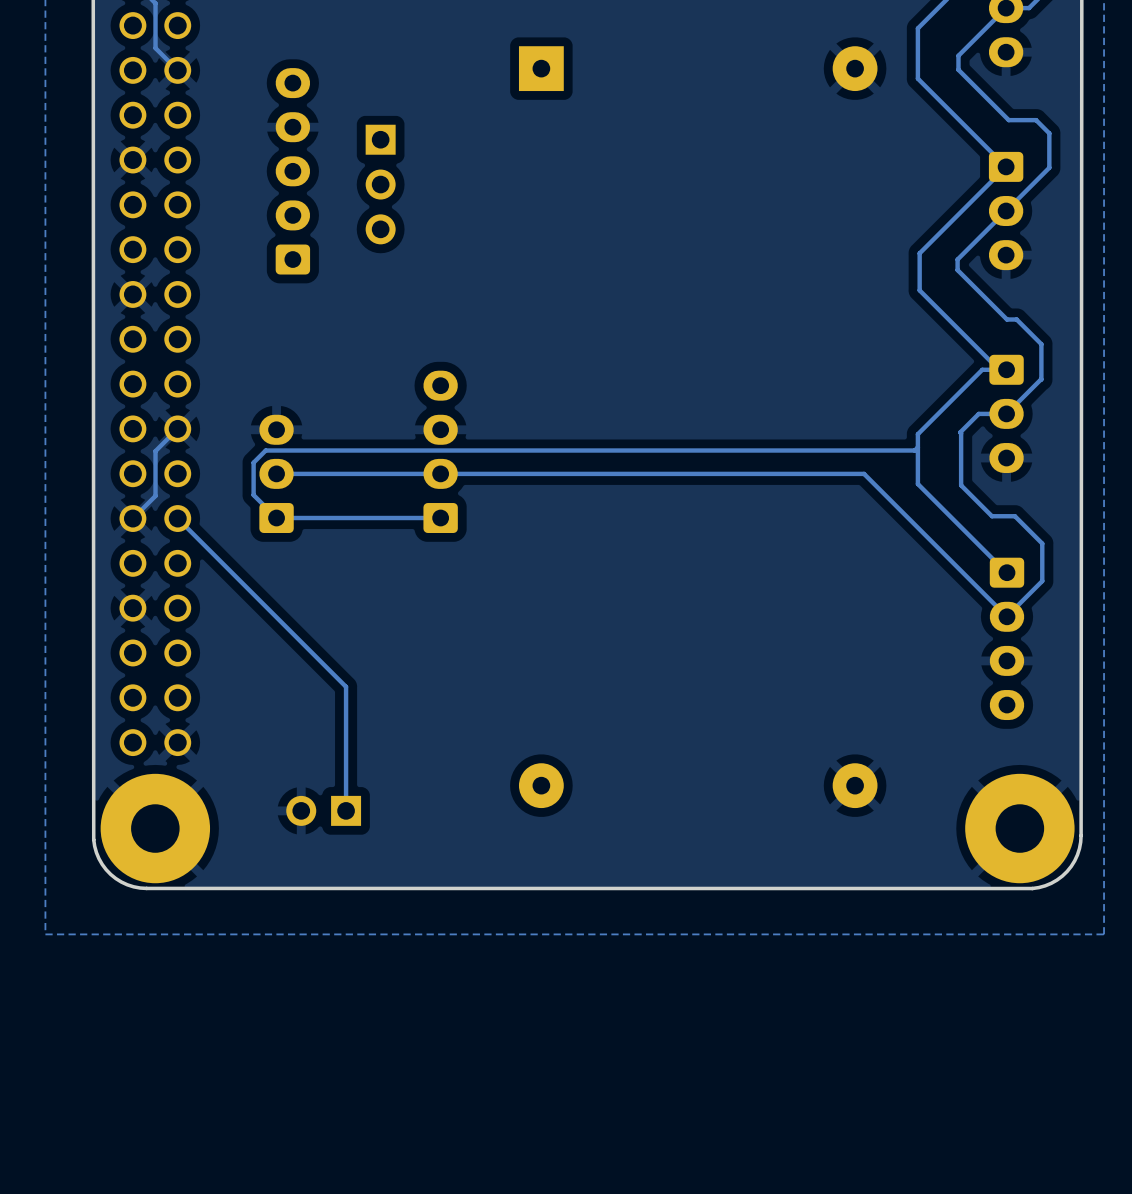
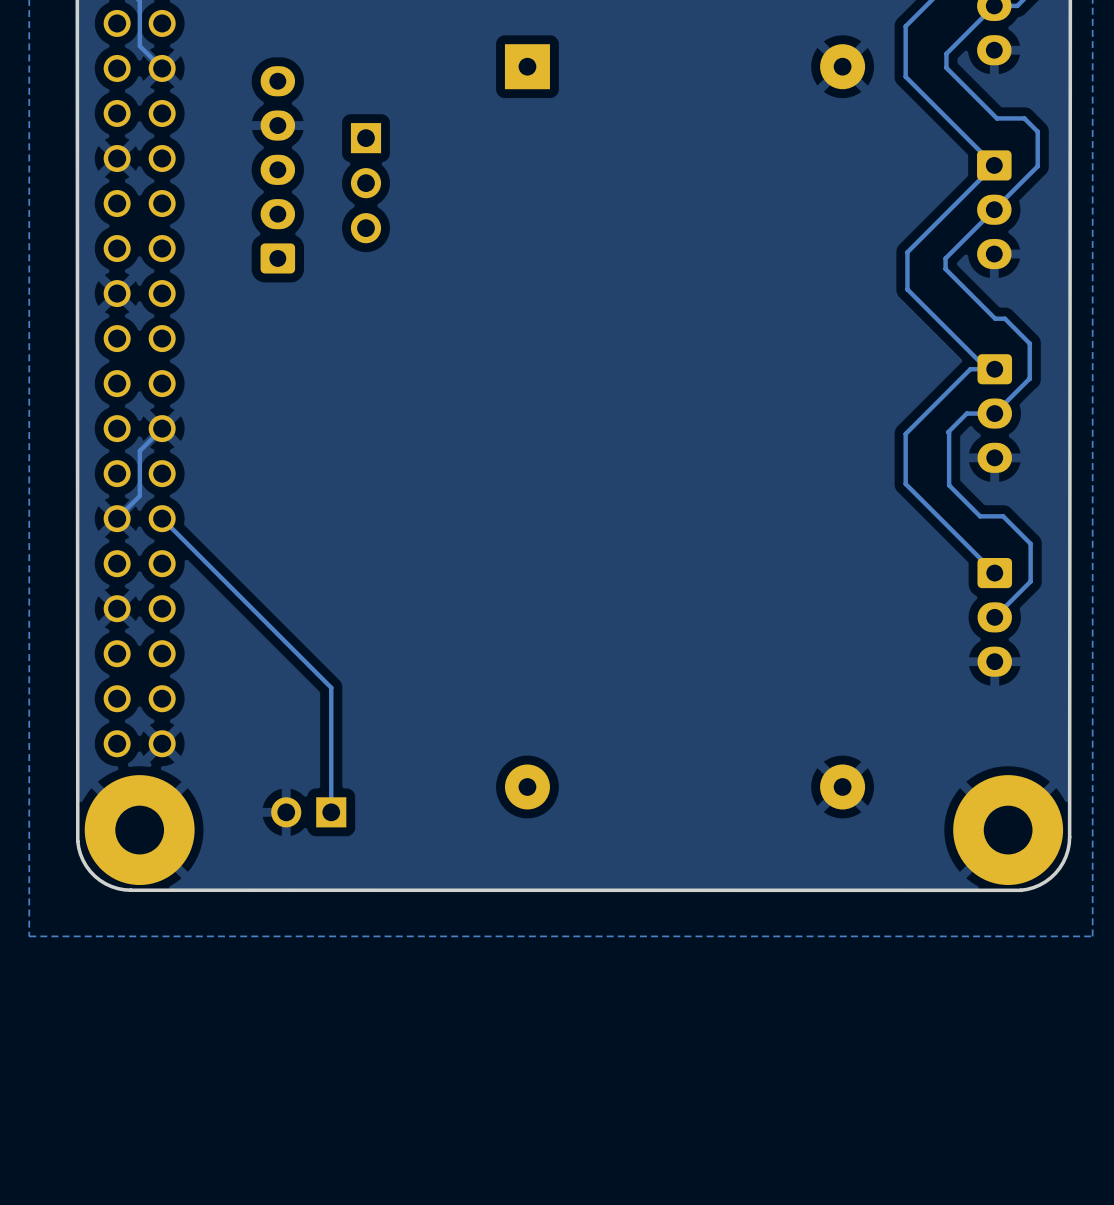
track: (917, 447) (914, 450) (265, 450) (253, 462) (253, 495) (276, 518) (440, 518) -> none
part: (440, 451) -> none
track: (276, 473) (864, 473) (1006, 616) -> none
part: (276, 473) -> none
part: none -> (994, 617)
part: (1006, 638) -> none

